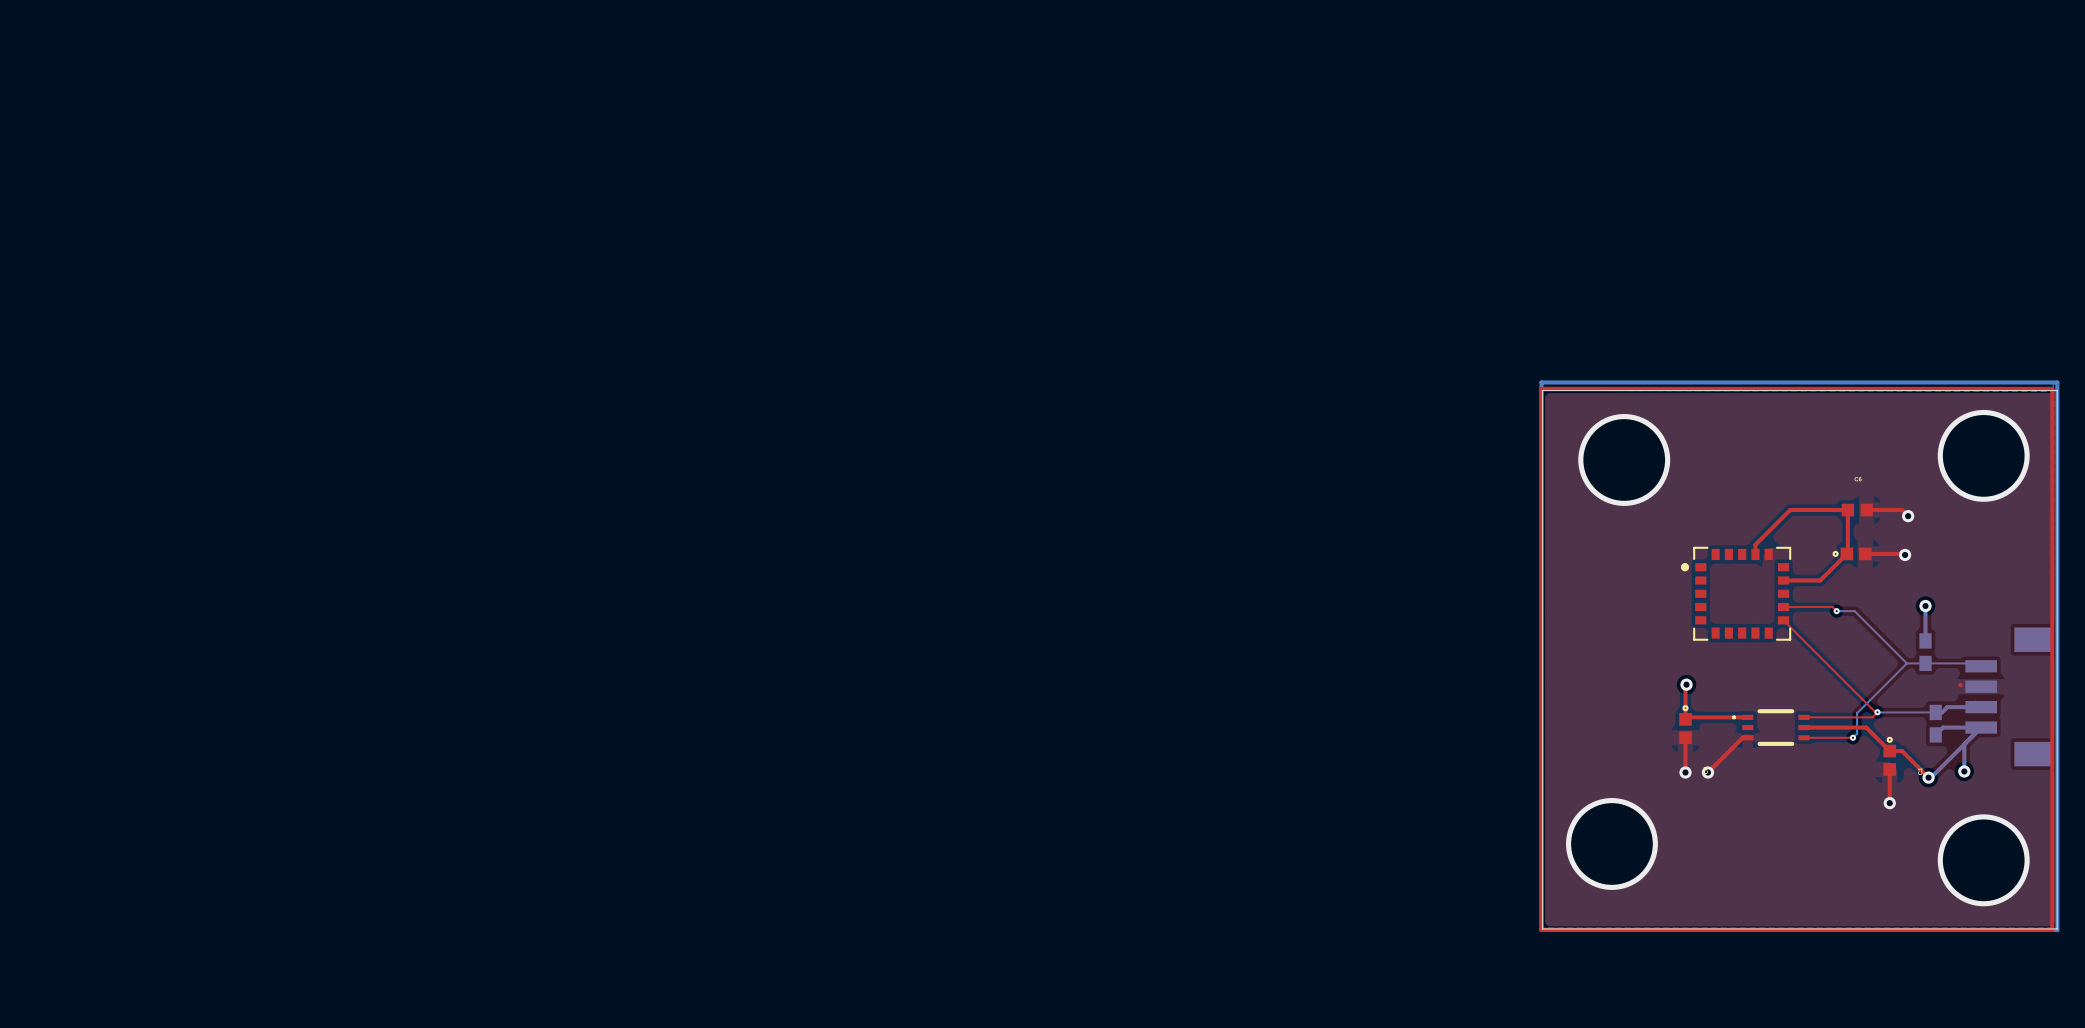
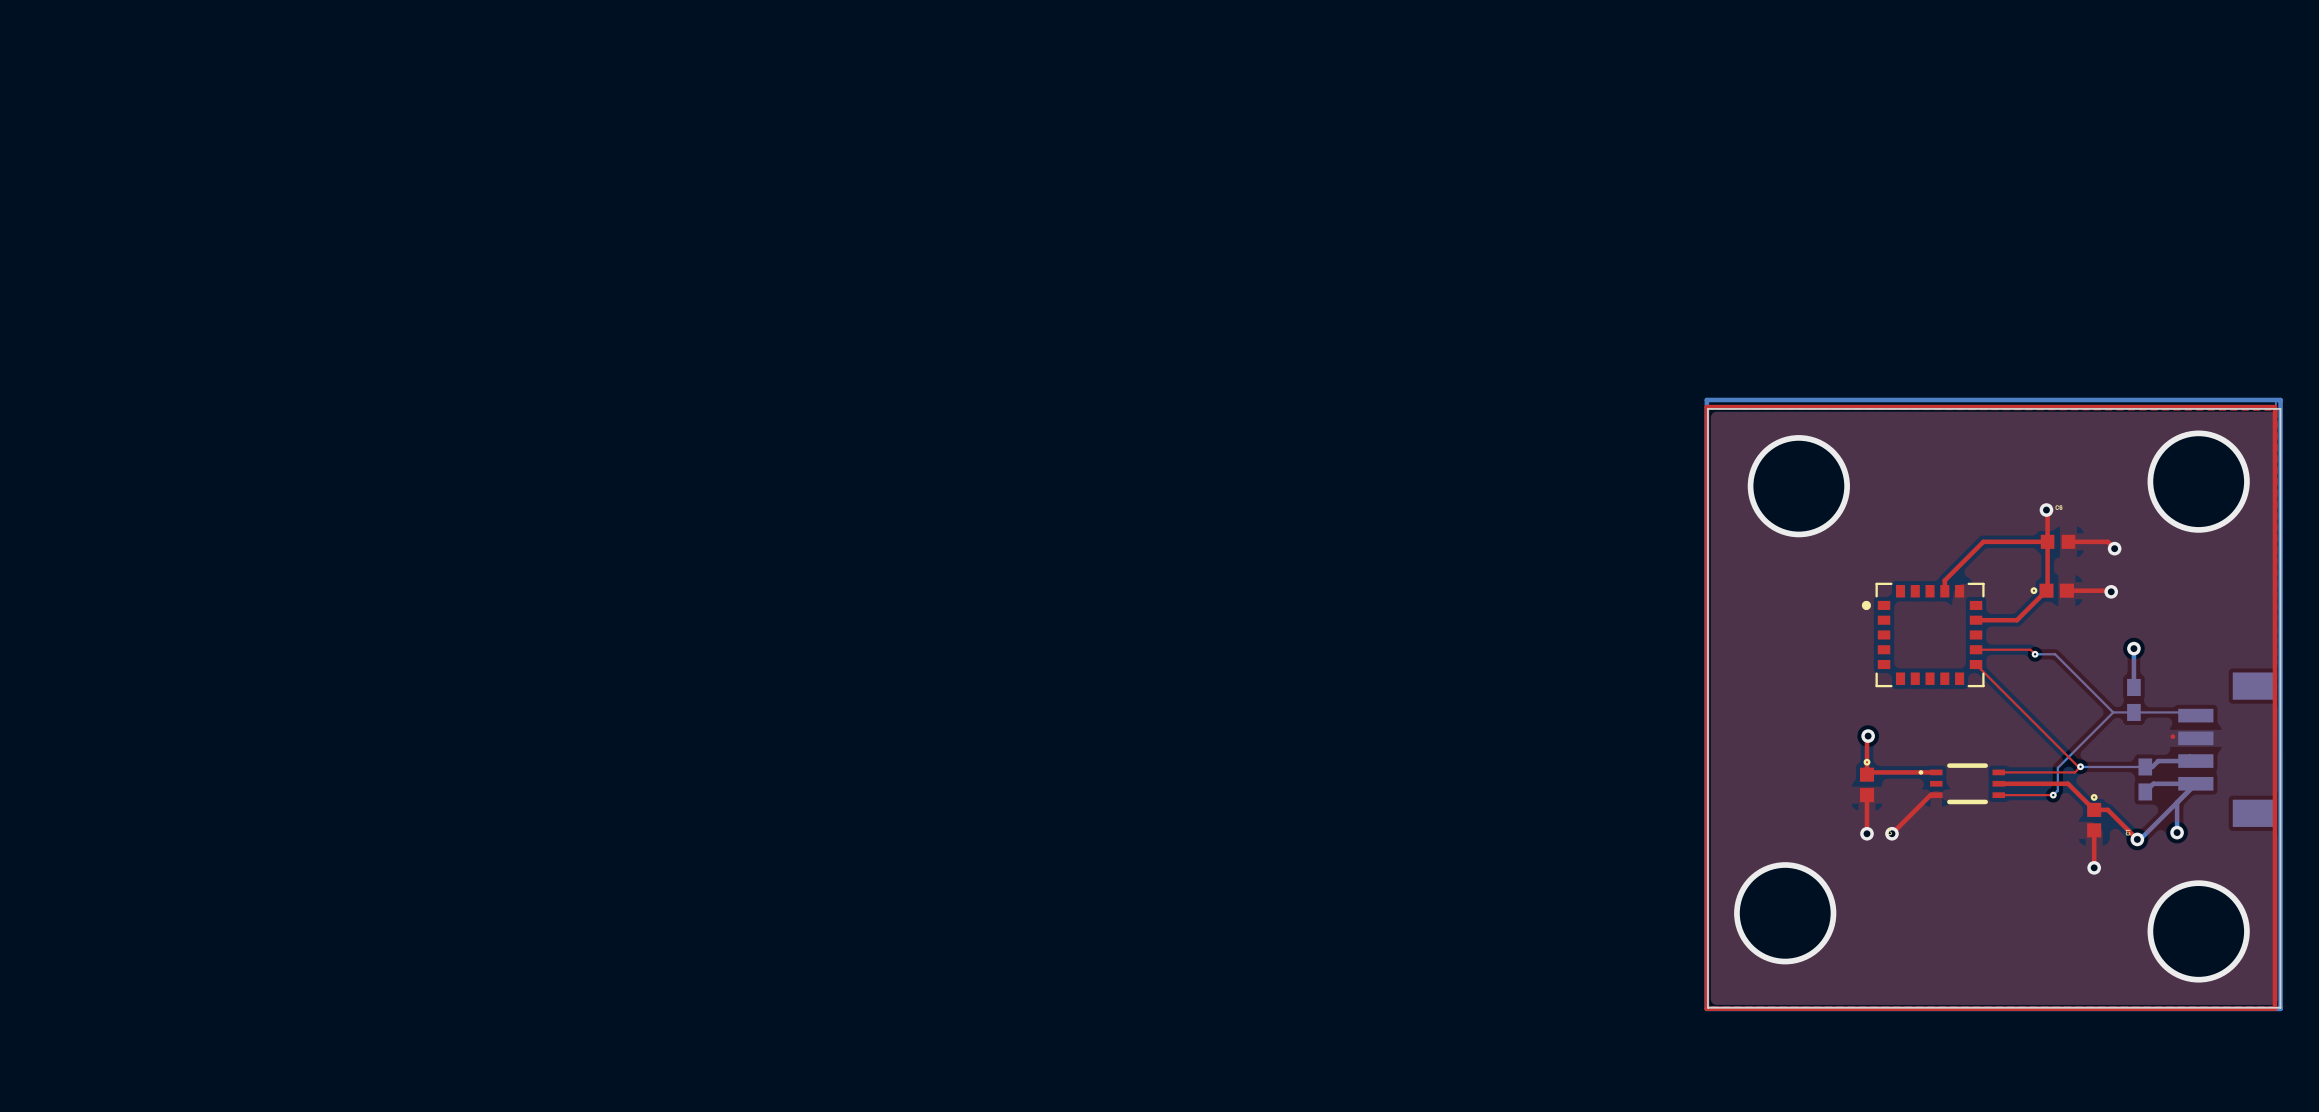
top track: none -> (2046, 510) (2047, 541)
via: none -> (2046, 510)

